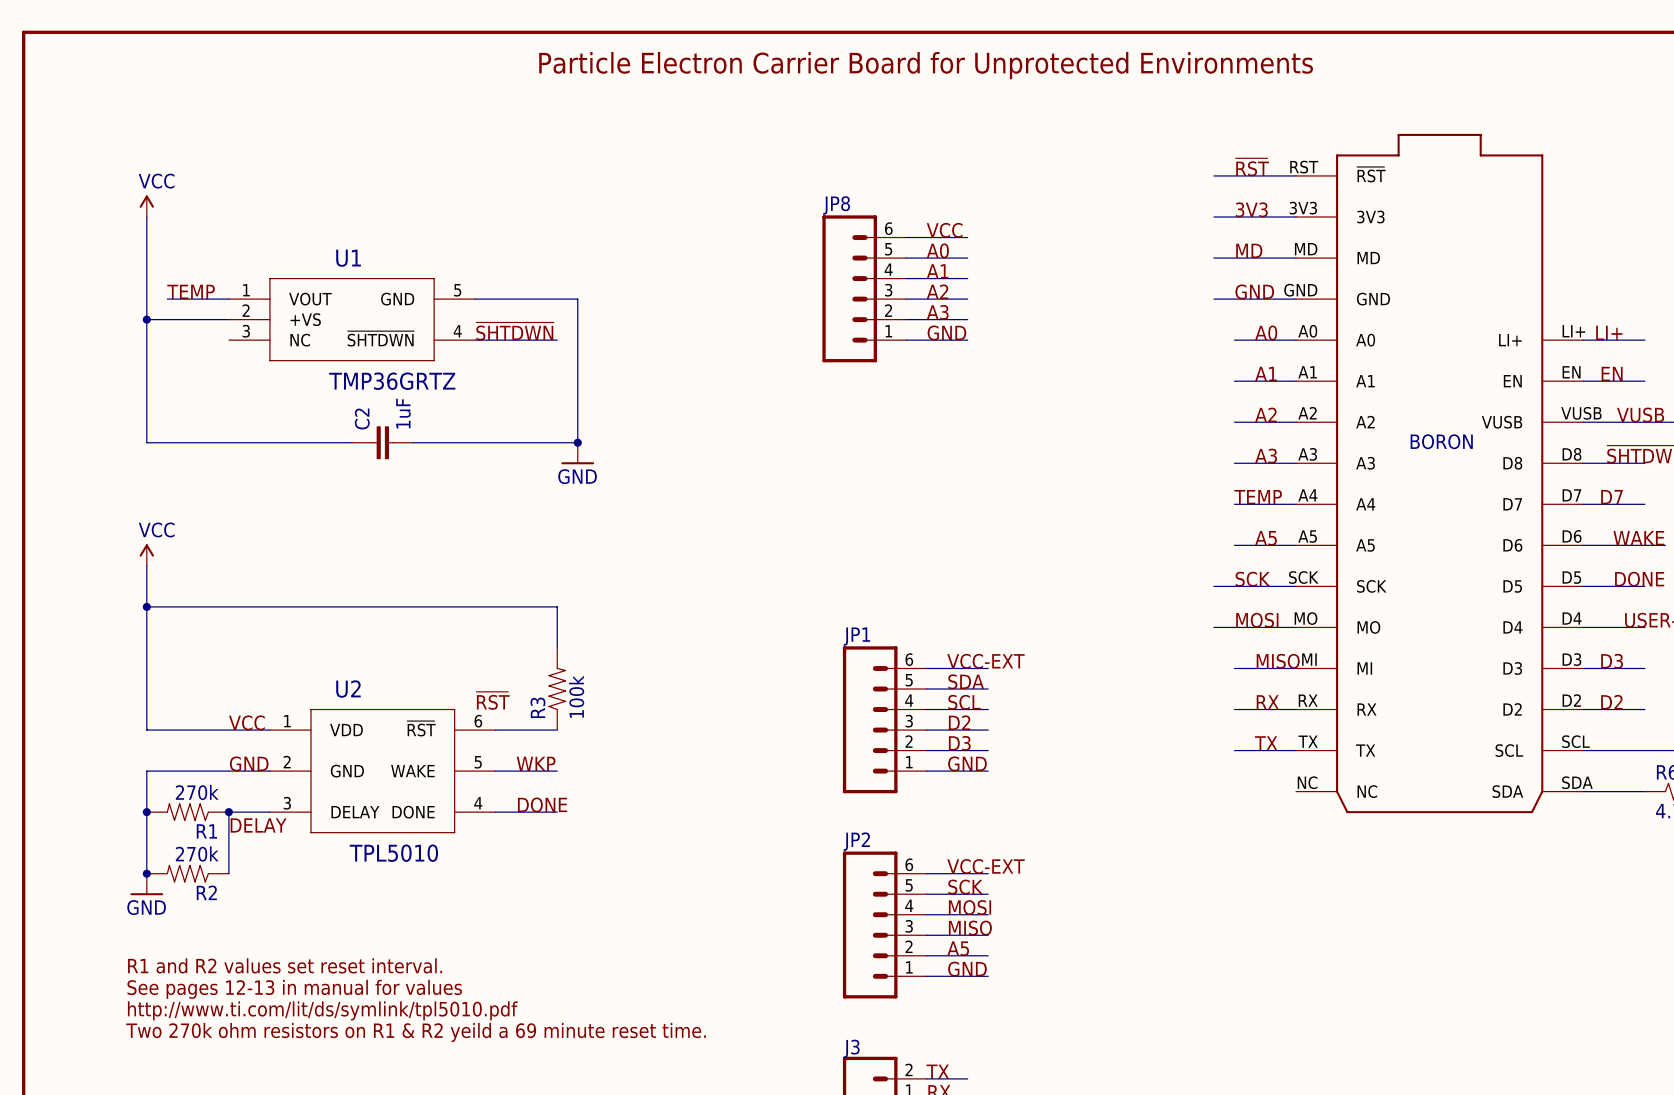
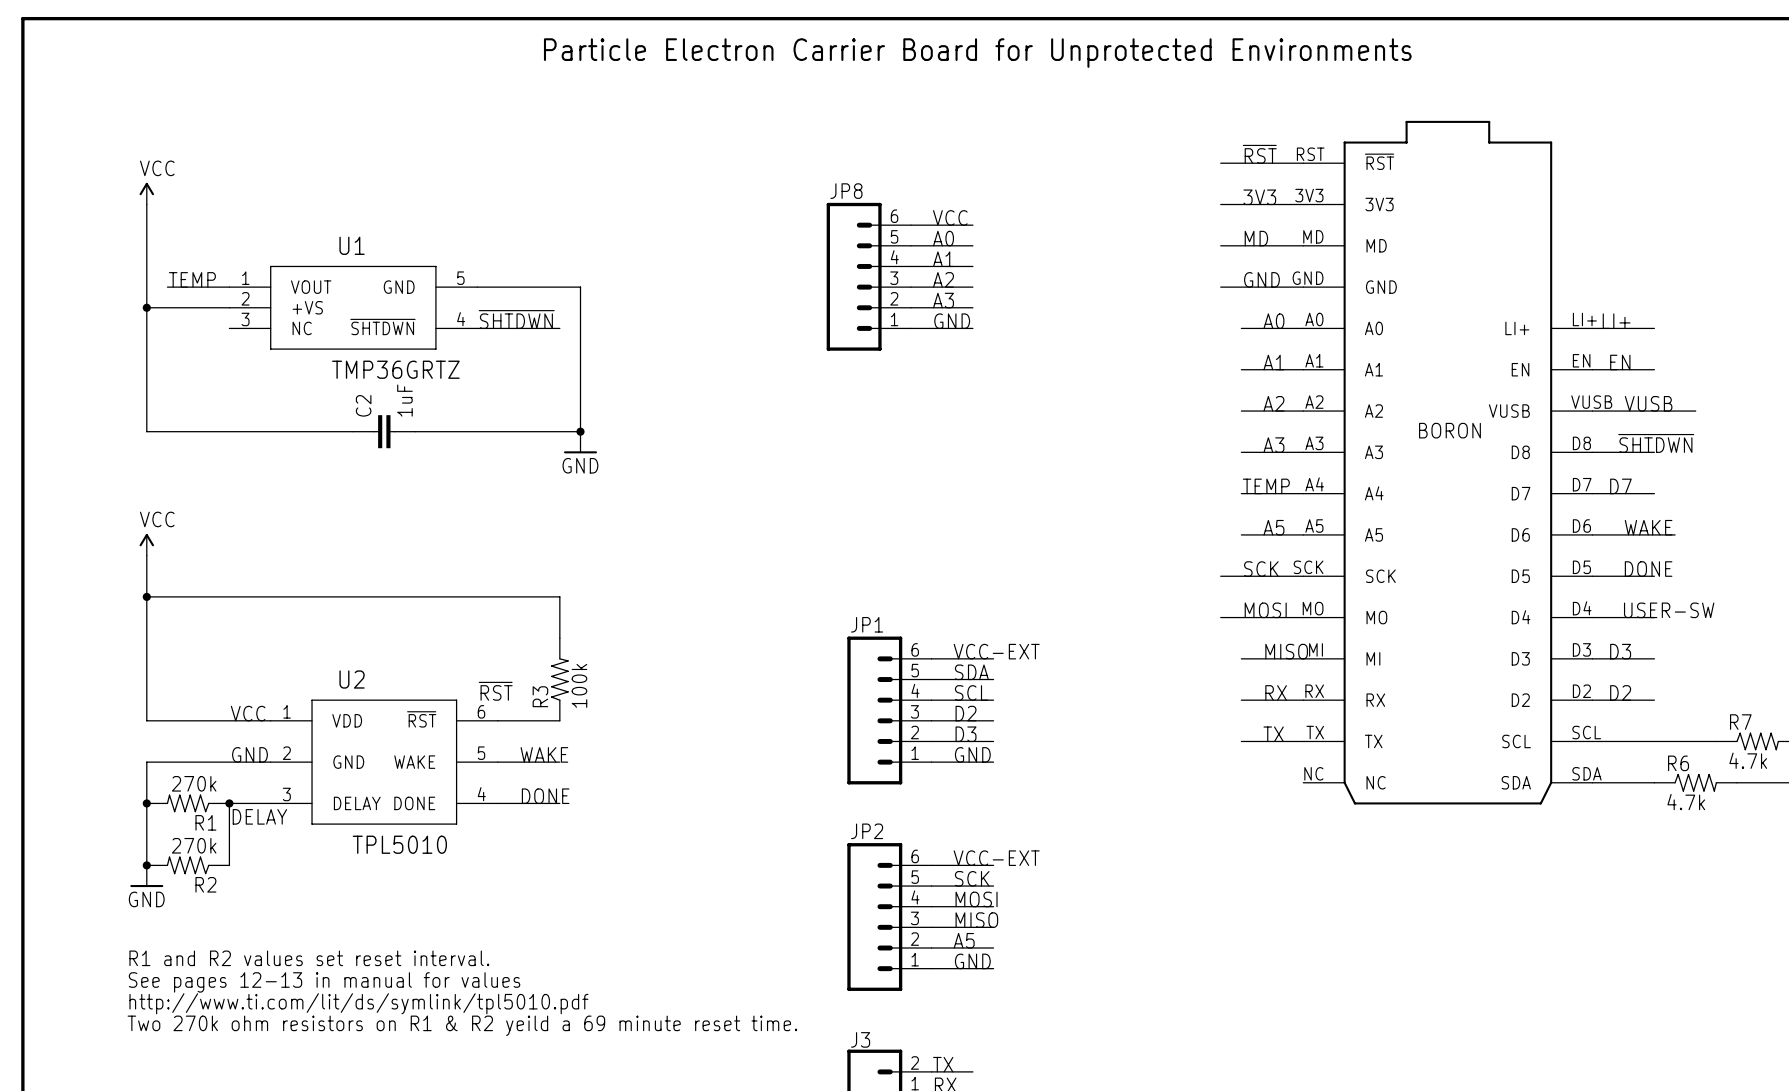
label: WKP (536, 763) -> WAKE (544, 754)

